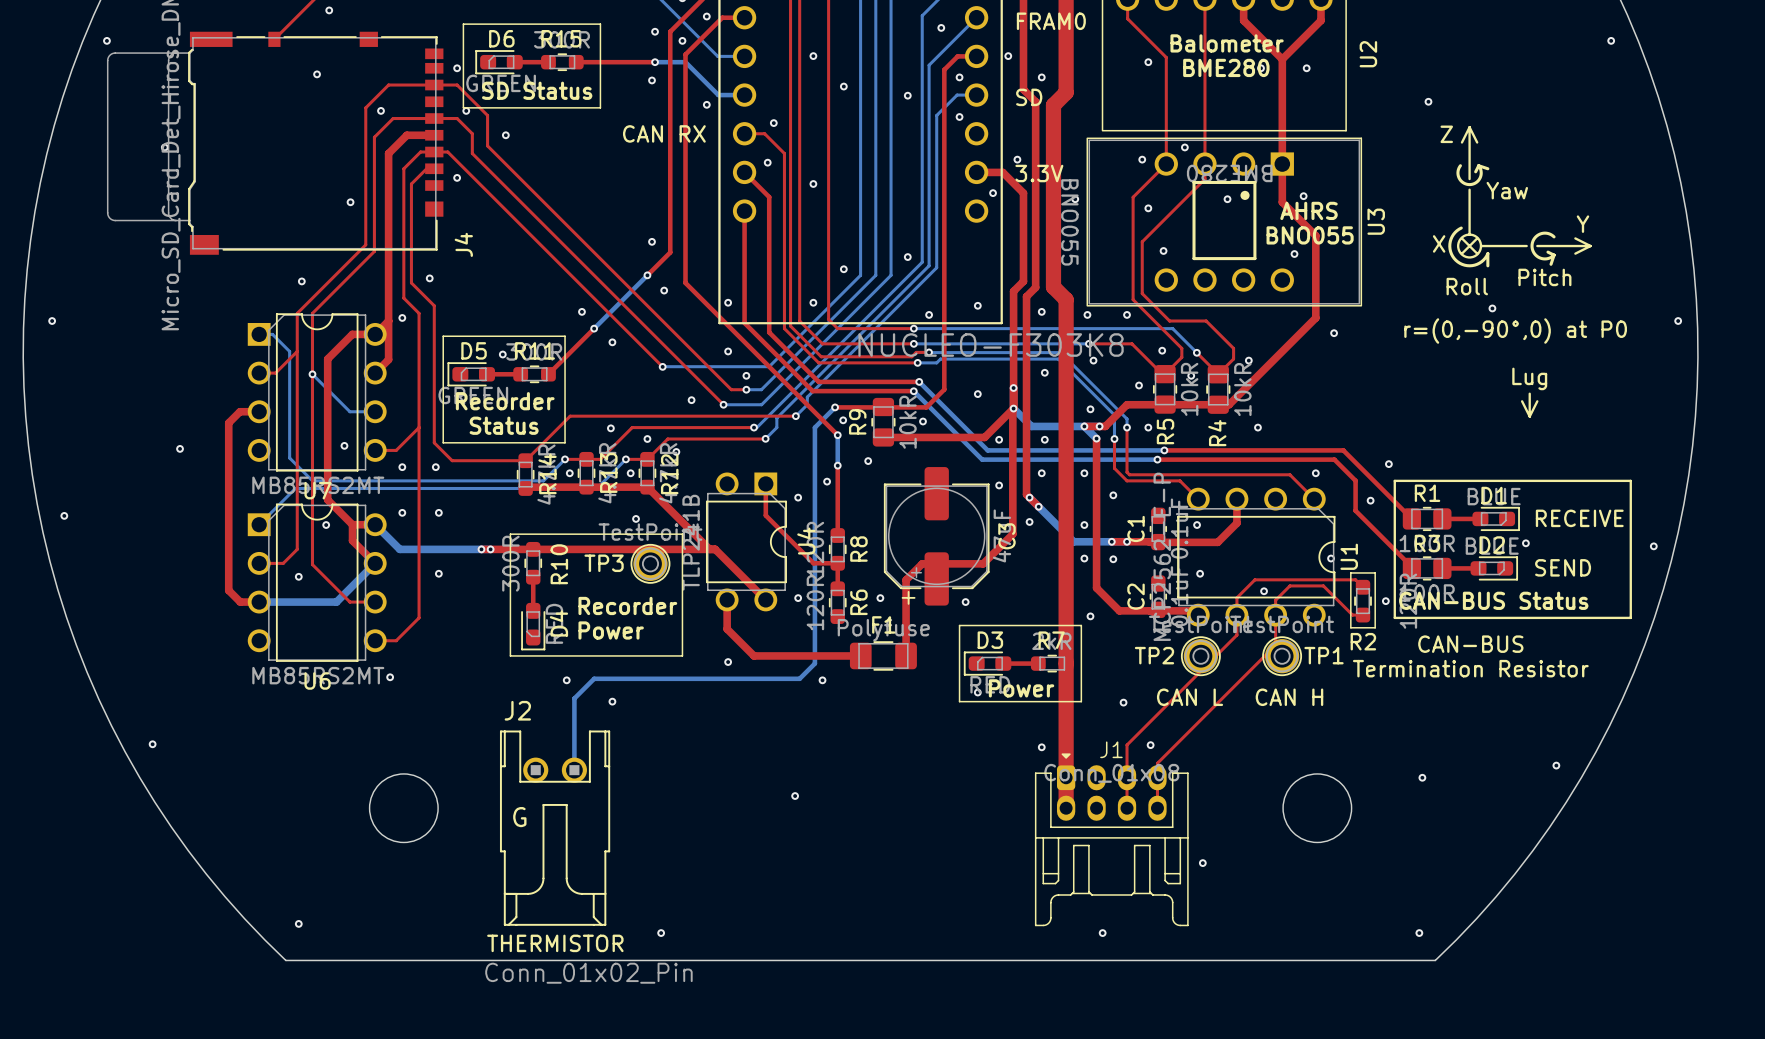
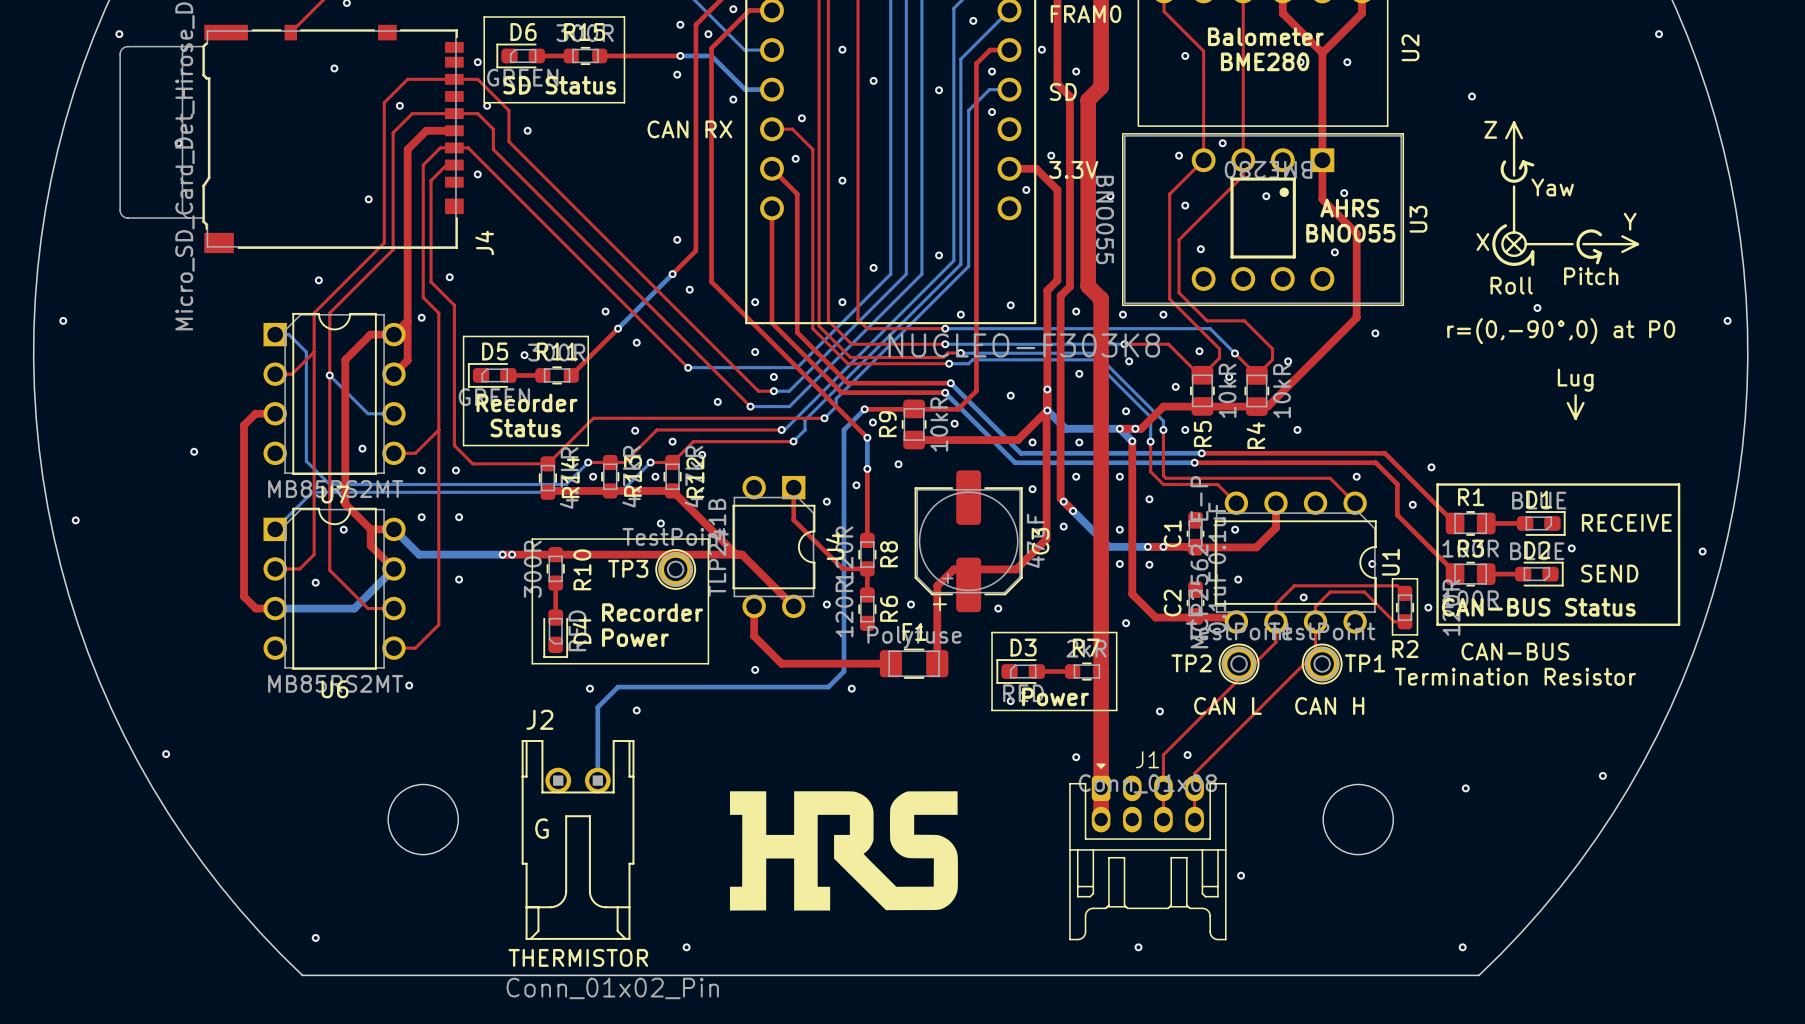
drawing: none -> [729, 791, 958, 911]
via: (795, 796) -> none

